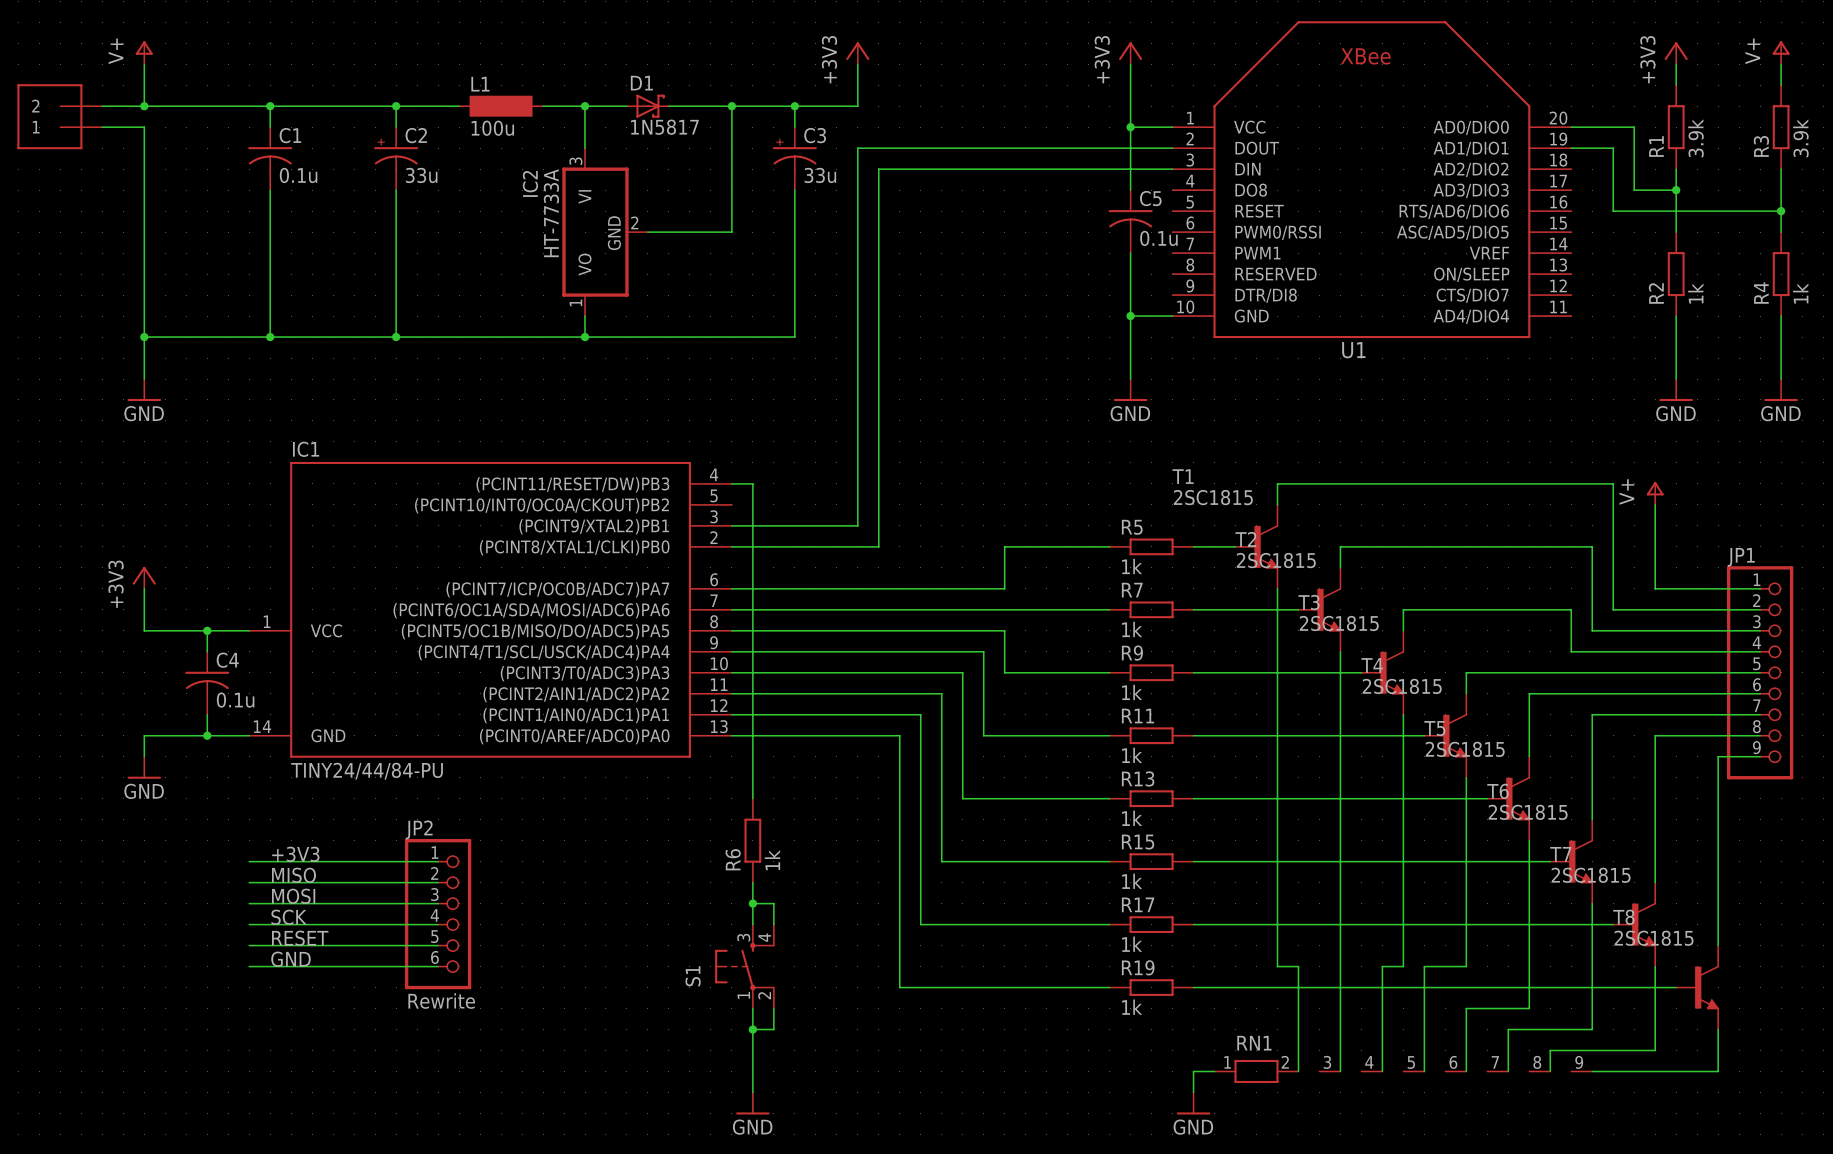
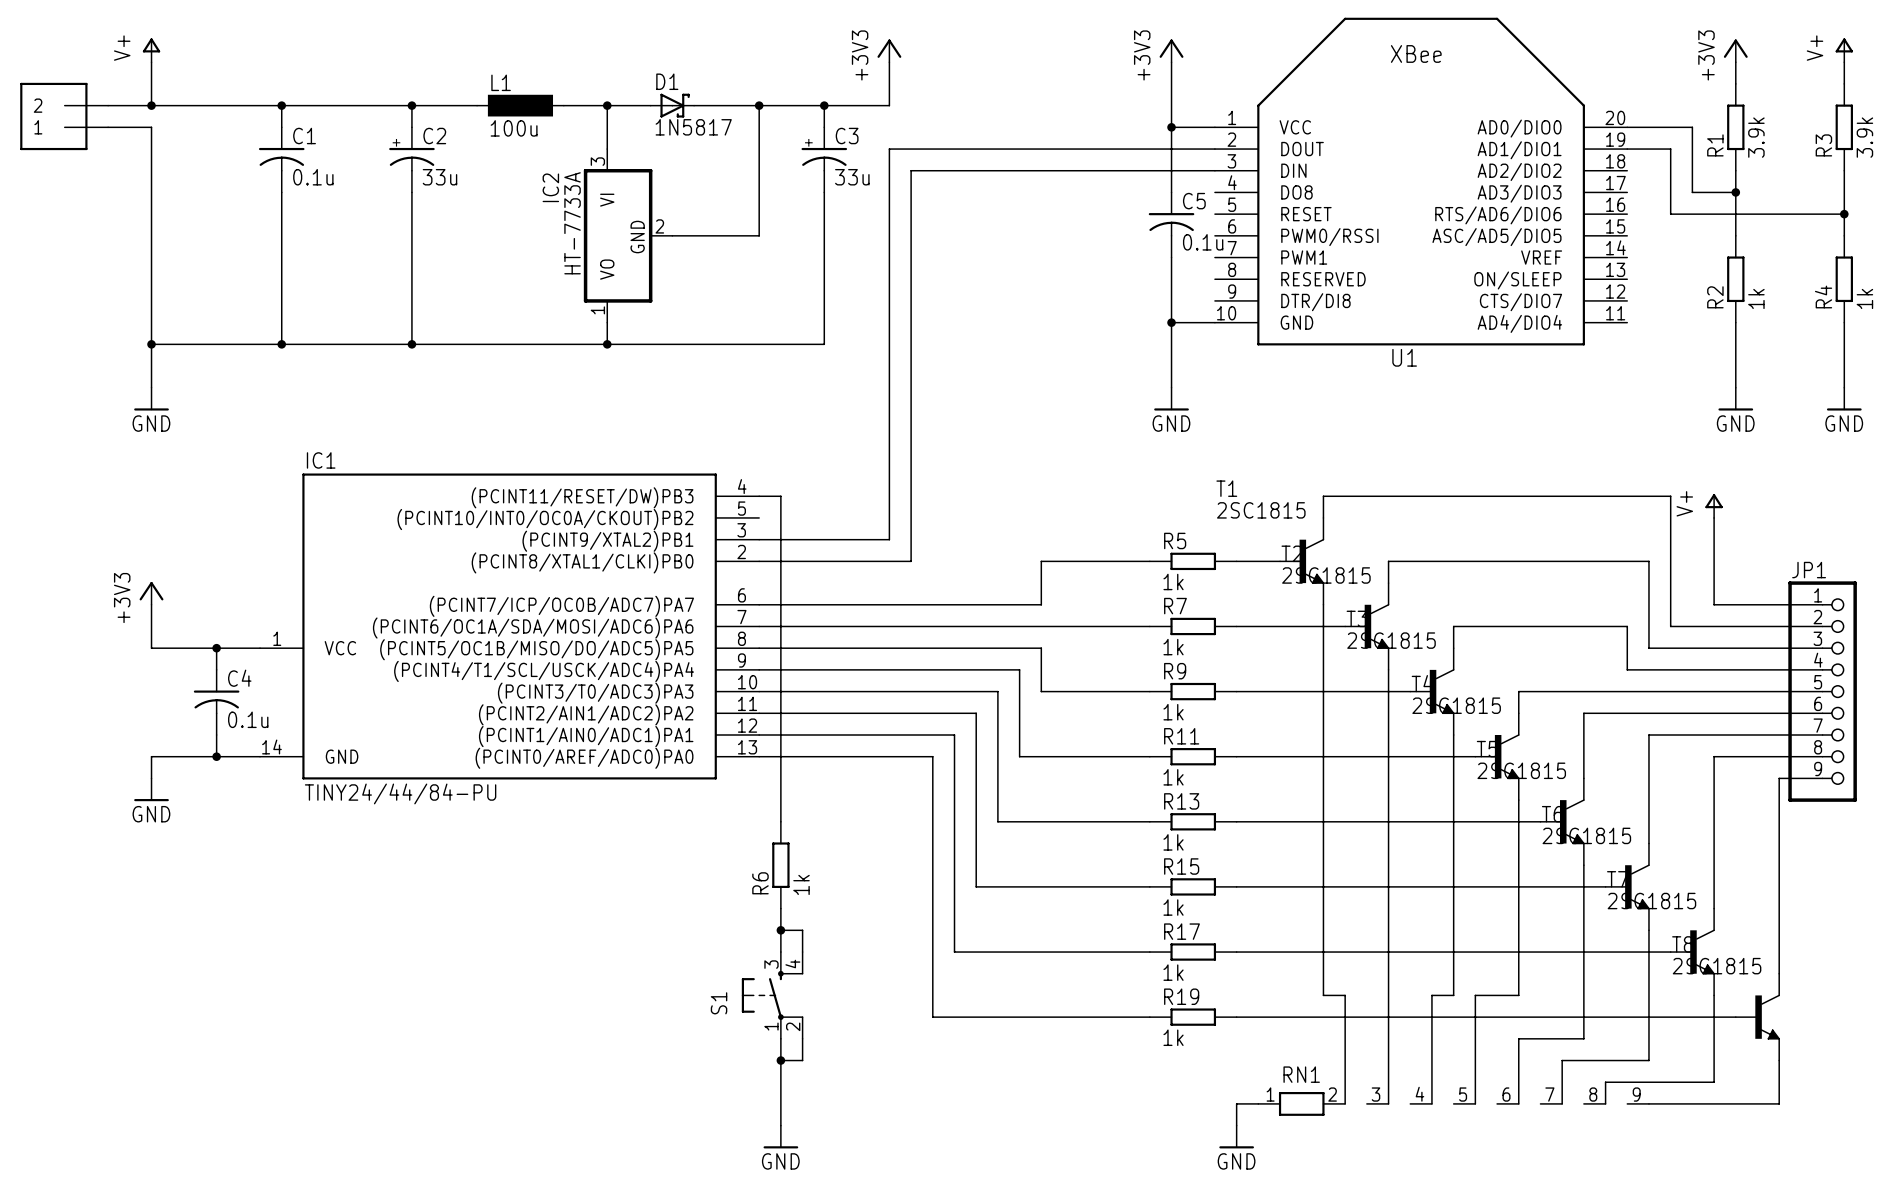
label: +3V3 (295, 854) -> none
wire: (249, 861) (438, 861) -> none
label: MISO (294, 875) -> none
wire: (249, 882) (438, 882) -> none
label: MOSI (293, 896) -> none
wire: (249, 903) (438, 903) -> none
JP2: Rewrite (438, 914) -> none
label: SCK (289, 917) -> none
wire: (249, 924) (438, 924) -> none
label: RESET (300, 938) -> none
wire: (249, 945) (438, 945) -> none
label: GND (290, 959) -> none
wire: (249, 966) (438, 966) -> none

